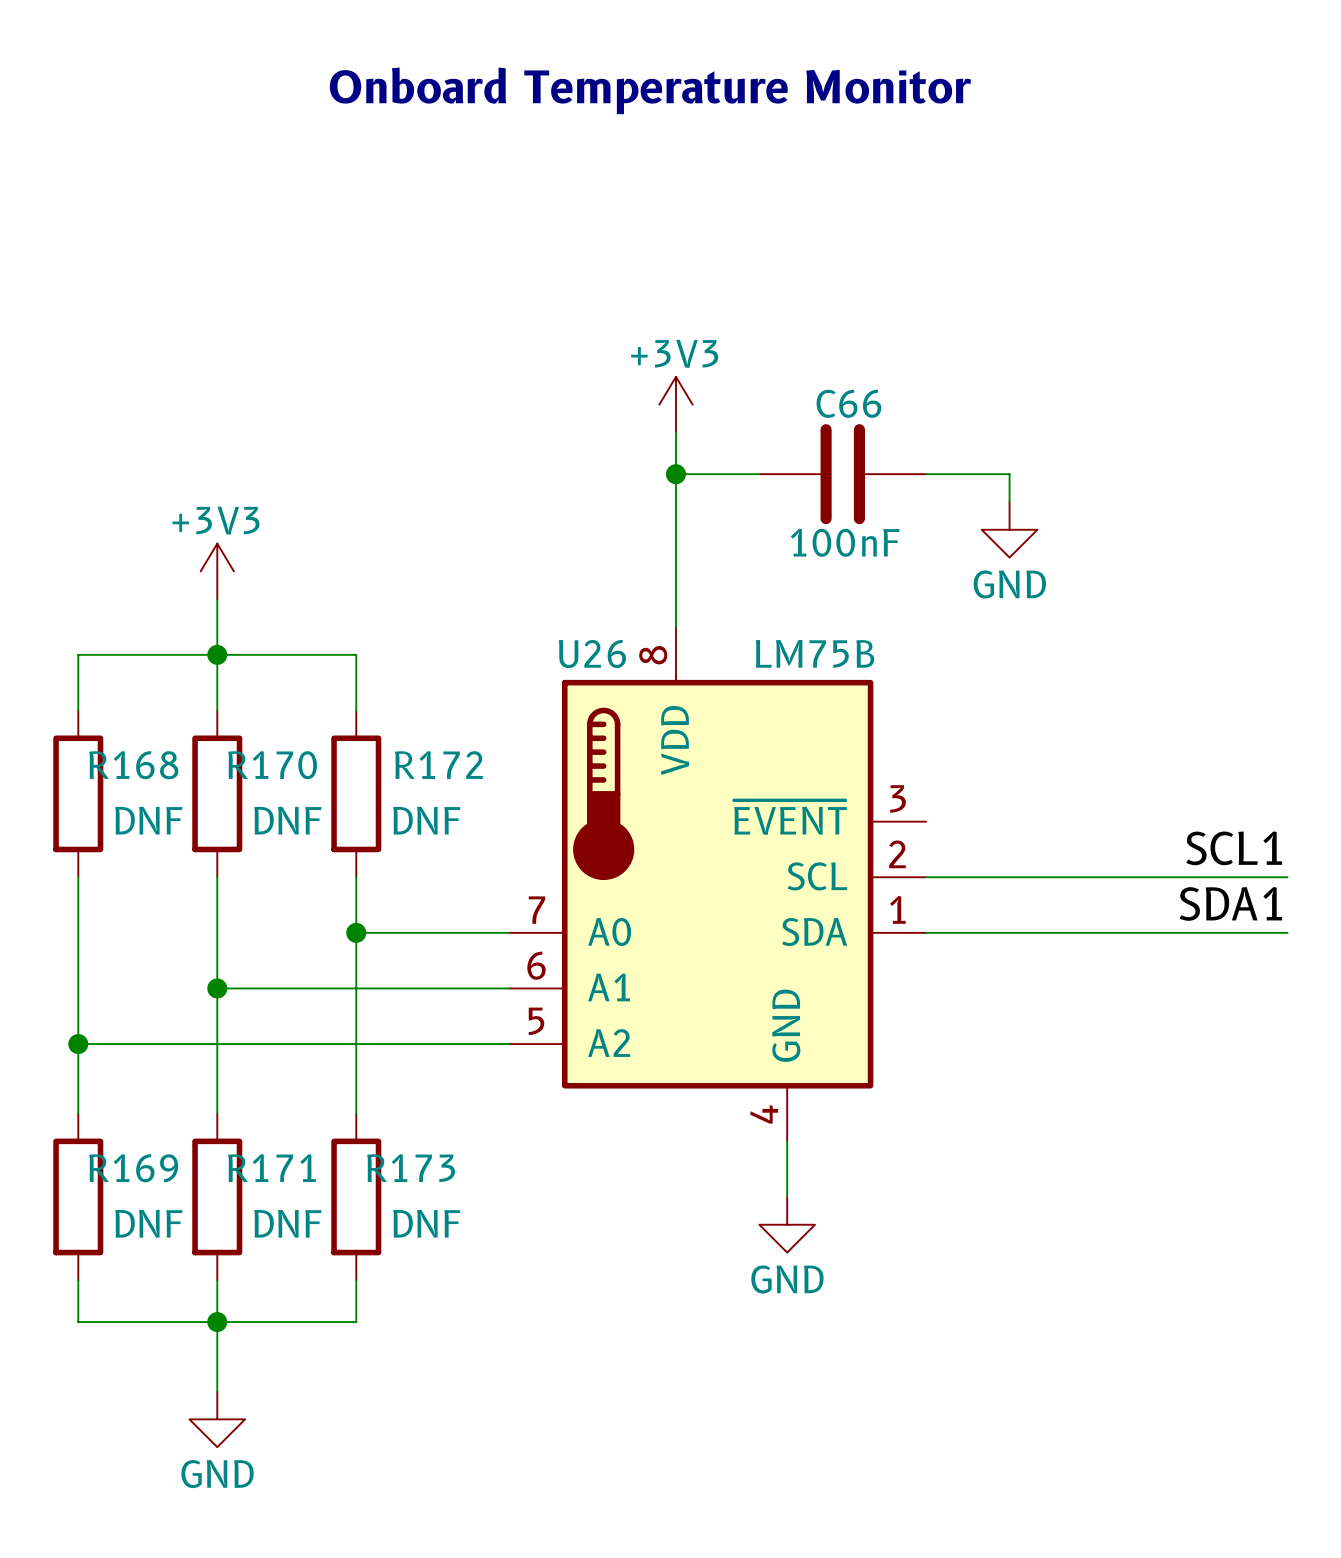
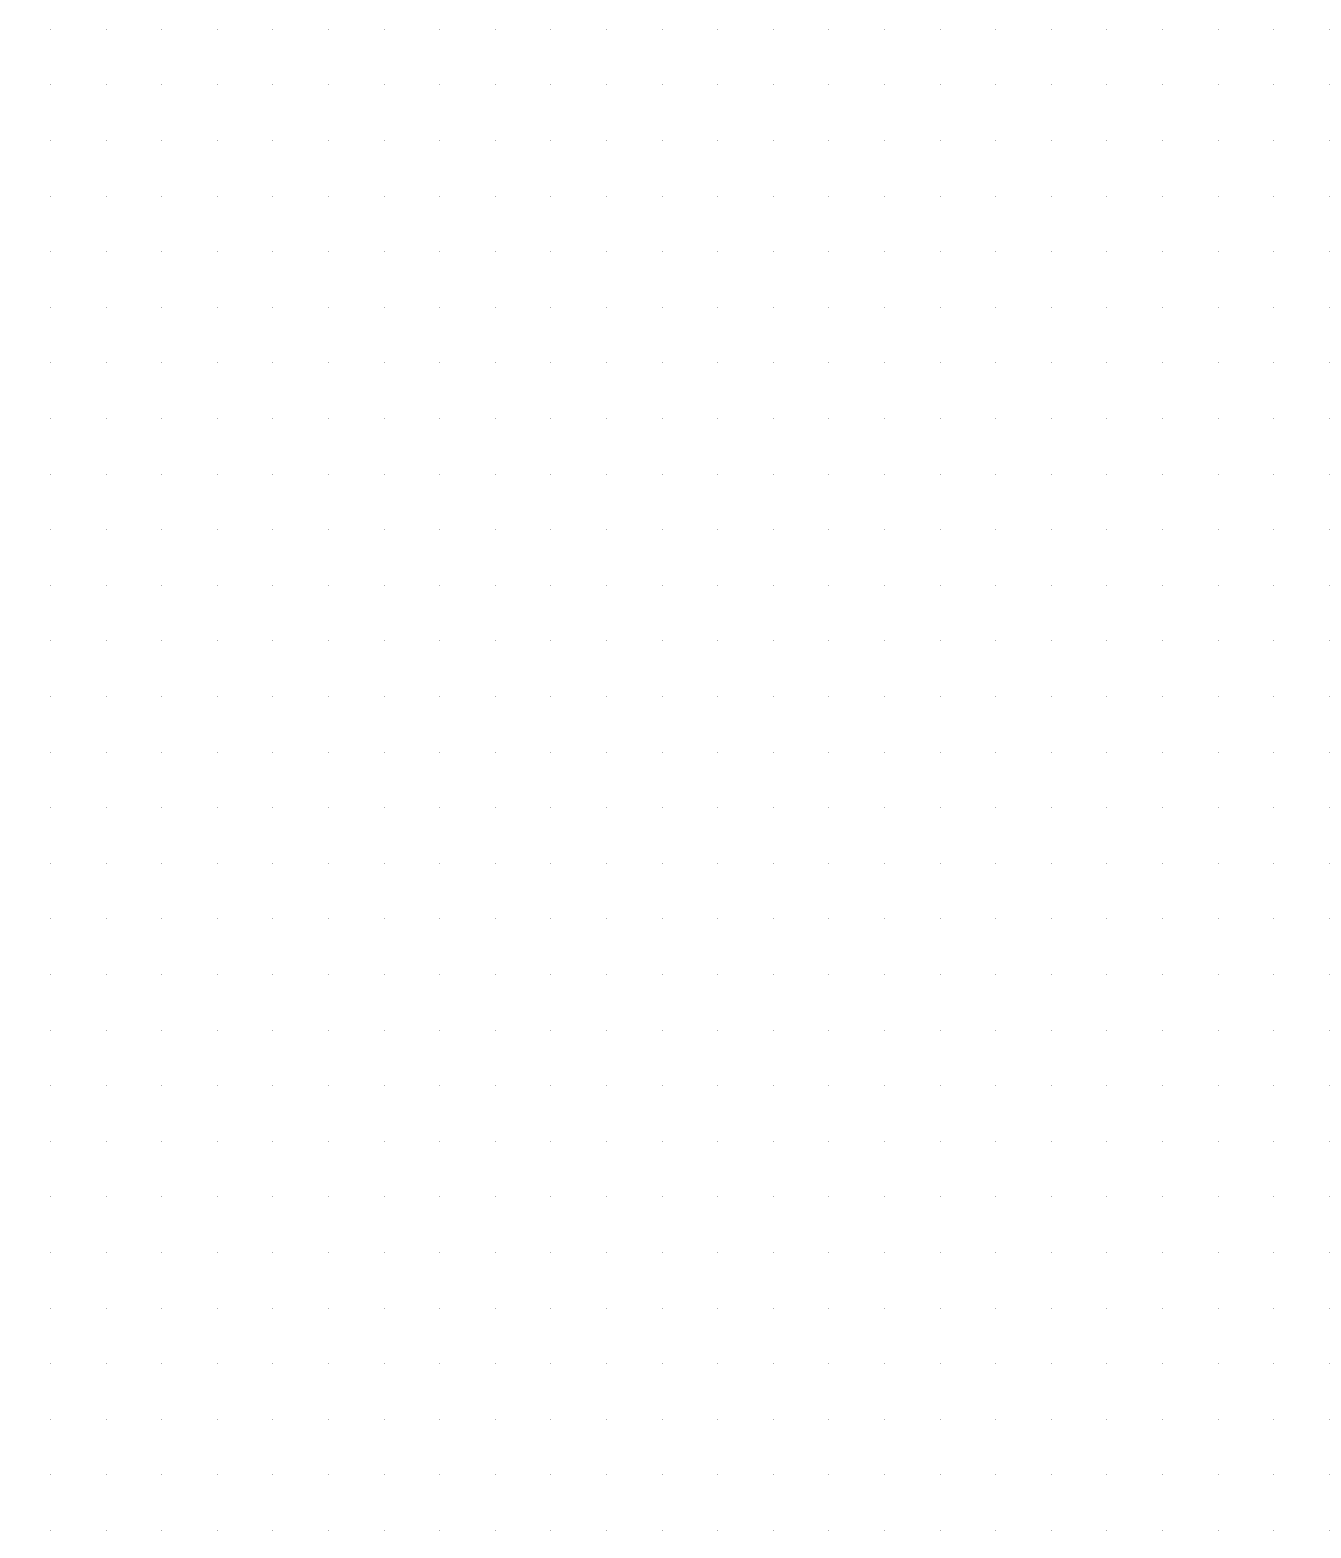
text: Onboard Temperature Monitor (650, 90) -> none
power symbol: +3V3 (675, 404) -> none
wire: (675, 432) (675, 627) -> none
wire: (675, 474) (759, 474) -> none
junction: (675, 474) -> none
C66: 100nF (842, 474) -> none
wire: (926, 474) (1009, 474) (1009, 501) -> none
power symbol: GND (1009, 529) -> none
power symbol: +3V3 (217, 571) -> none
wire: (217, 599) (217, 710) -> none
junction: (217, 654) -> none
wire: (78, 710) (78, 654) (356, 654) (356, 710) -> none
R168: DNF (78, 793) -> none
R170: DNF (217, 793) -> none
R172: DNF (356, 793) -> none
label: SCL1 (1234, 848) -> none
wire: (78, 877) (78, 1113) -> none
wire: (217, 877) (217, 1113) -> none
wire: (356, 877) (356, 1113) -> none
wire: (926, 877) (1287, 877) -> none
U26: LM75B (717, 884) -> none
label: SDA1 (1230, 903) -> none
wire: (356, 932) (509, 932) -> none
junction: (356, 932) -> none
wire: (926, 932) (1287, 932) -> none
wire: (217, 988) (509, 988) -> none
junction: (217, 988) -> none
wire: (78, 1044) (509, 1044) -> none
junction: (78, 1044) -> none
wire: (787, 1141) (787, 1196) -> none
R169: DNF (78, 1196) -> none
R171: DNF (217, 1196) -> none
R173: DNF (356, 1196) -> none
power symbol: GND (787, 1224) -> none
wire: (78, 1280) (78, 1322) (356, 1322) (356, 1280) -> none
wire: (217, 1280) (217, 1391) -> none
junction: (217, 1322) -> none
power symbol: GND (217, 1419) -> none

